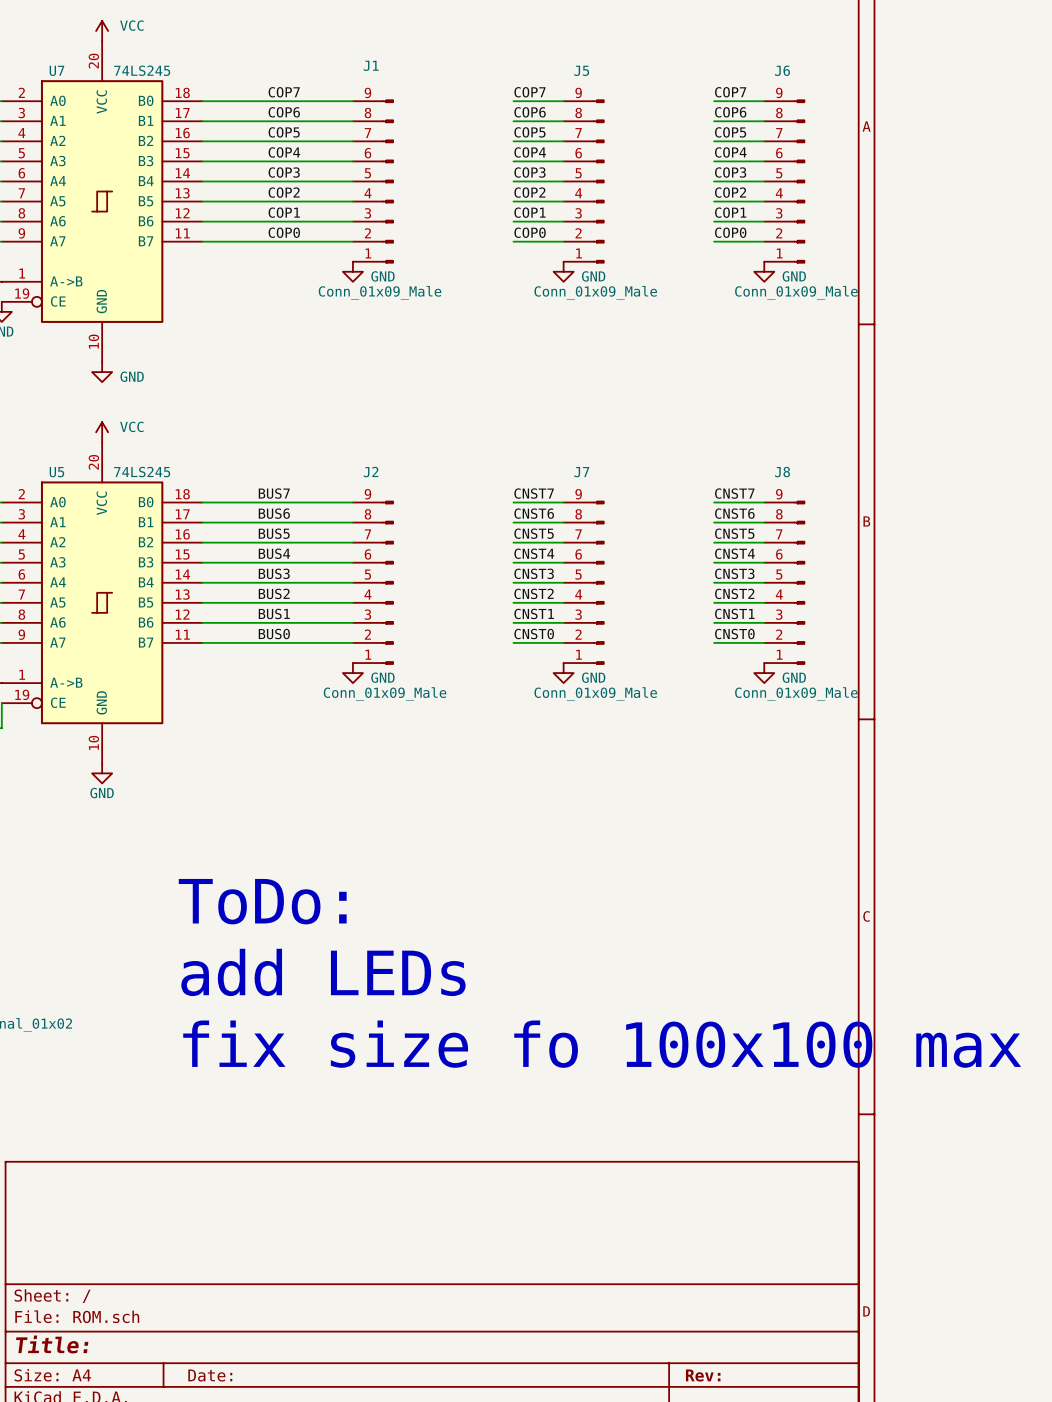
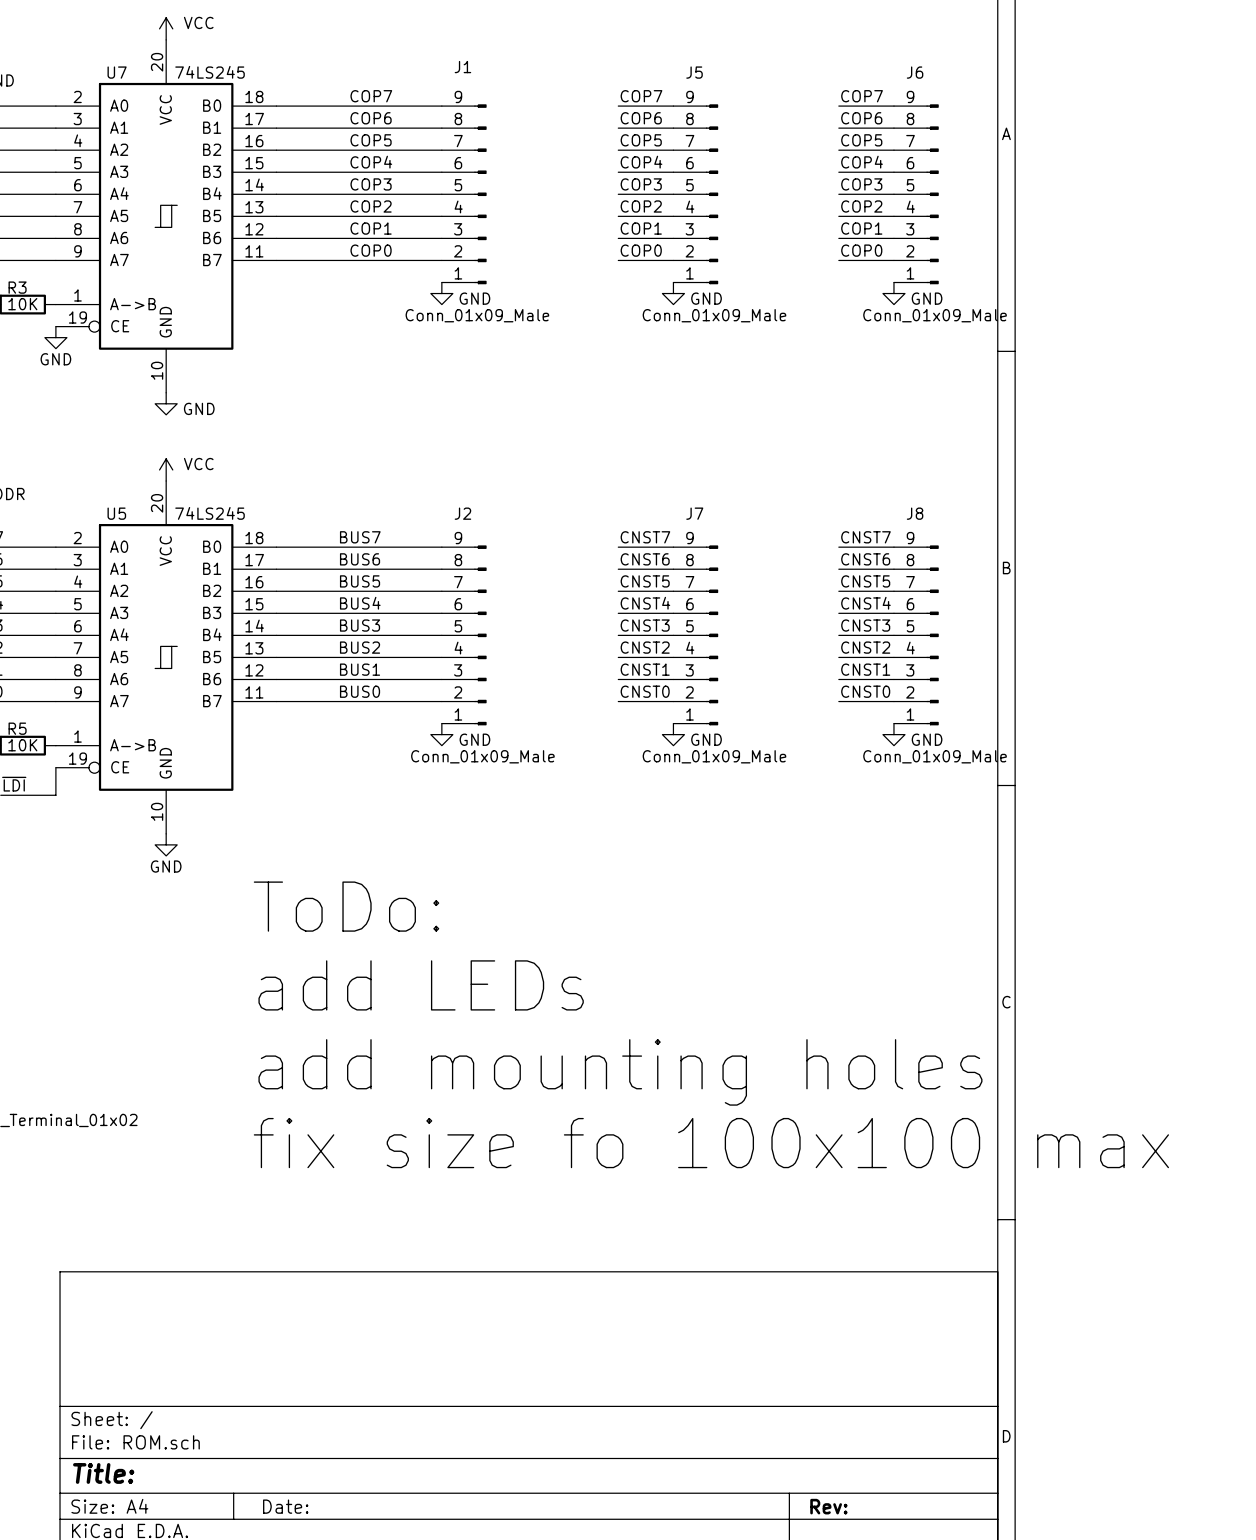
text: none -> ToDo: (346, 906)
text: ToDo: (262, 901) -> add LEDs (421, 985)
text: add LEDs (323, 972) -> add mounting holes (620, 1072)

